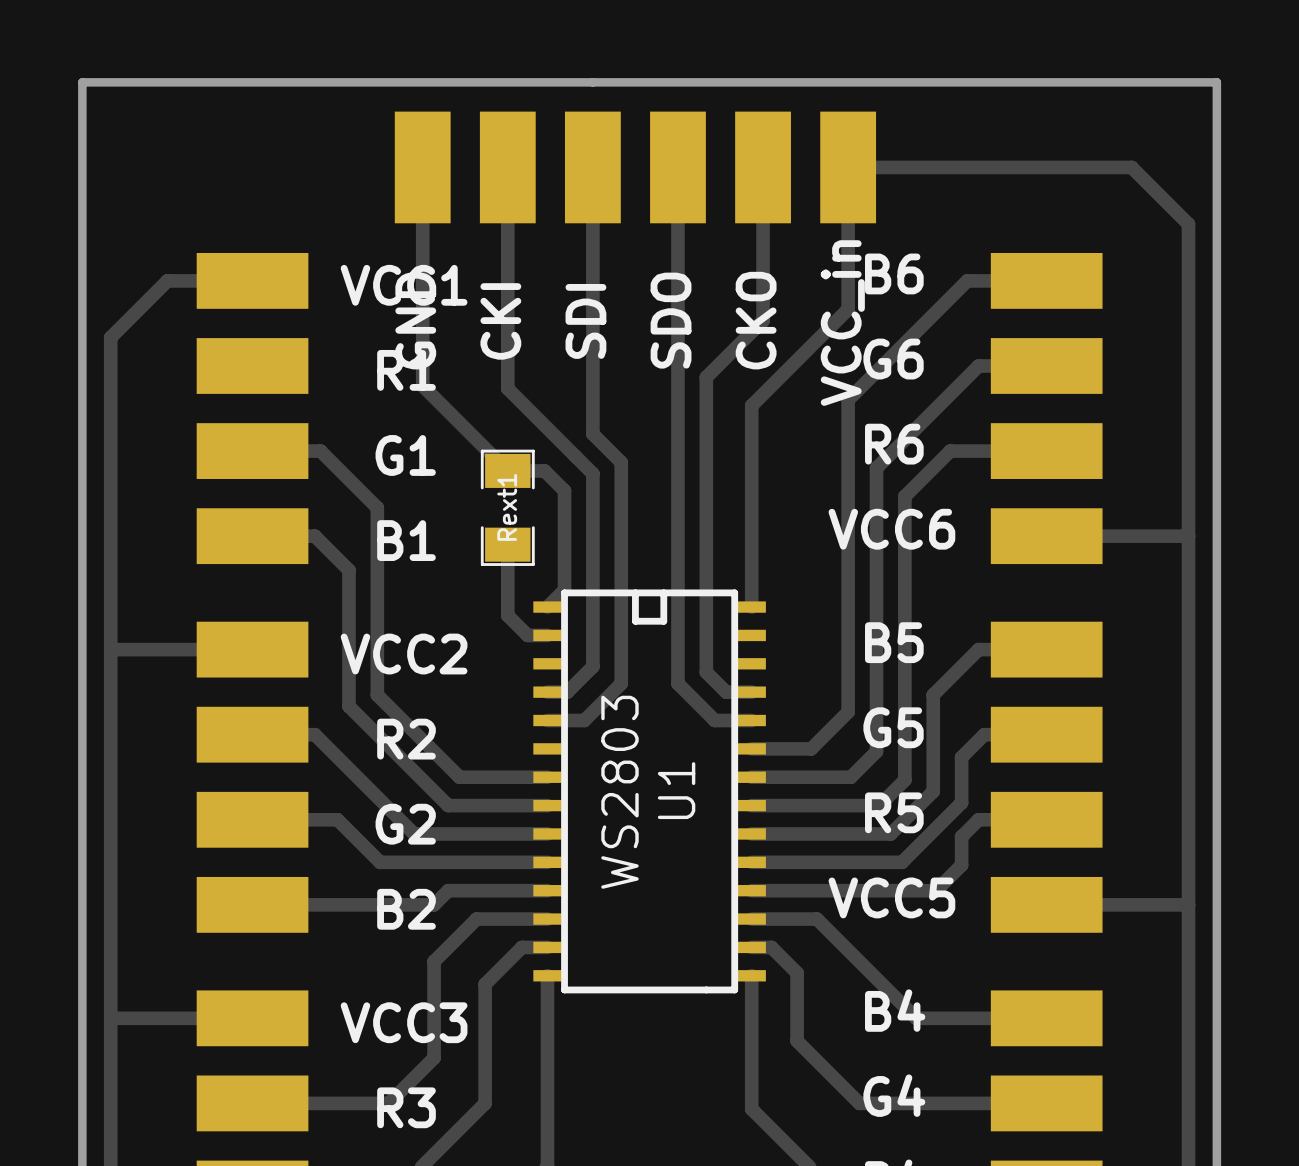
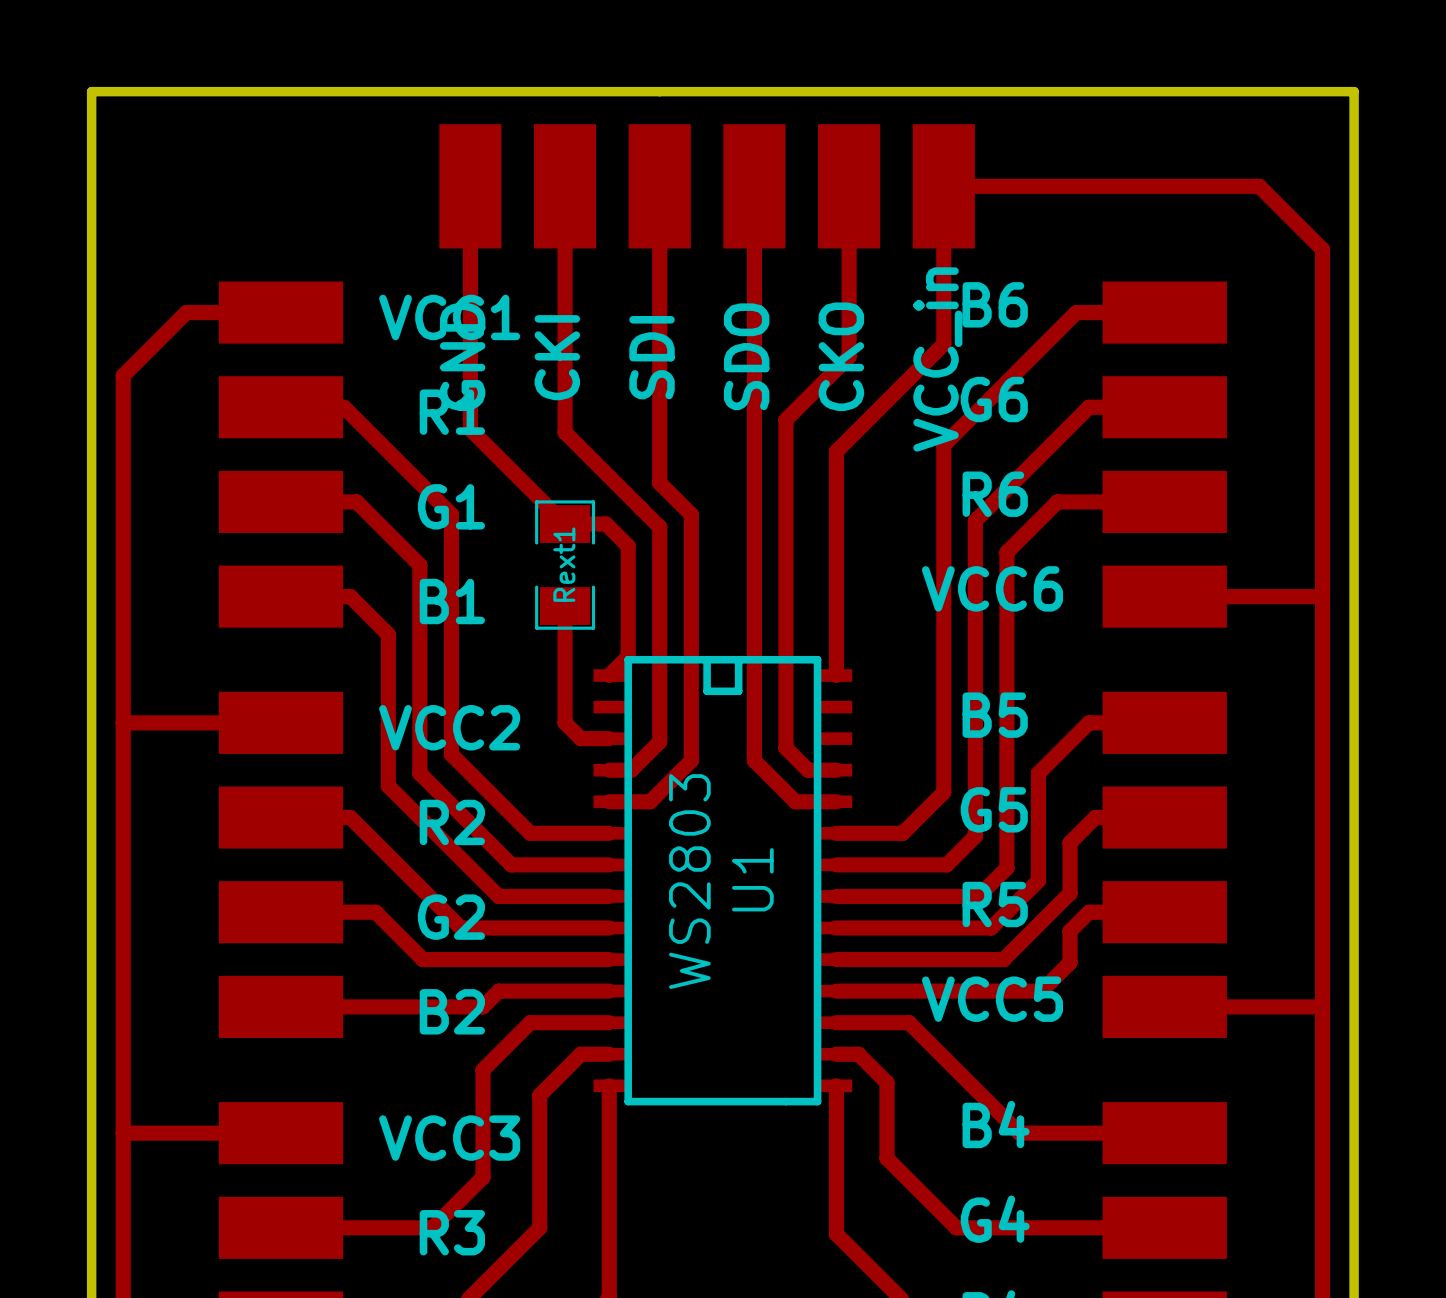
track: none -> (281, 407) (344, 407) (451, 514) (451, 754) (530, 833) (609, 833)
track: (507, 615) (527, 635) (547, 635) -> (565, 684) (565, 722) (580, 738) (609, 738)

